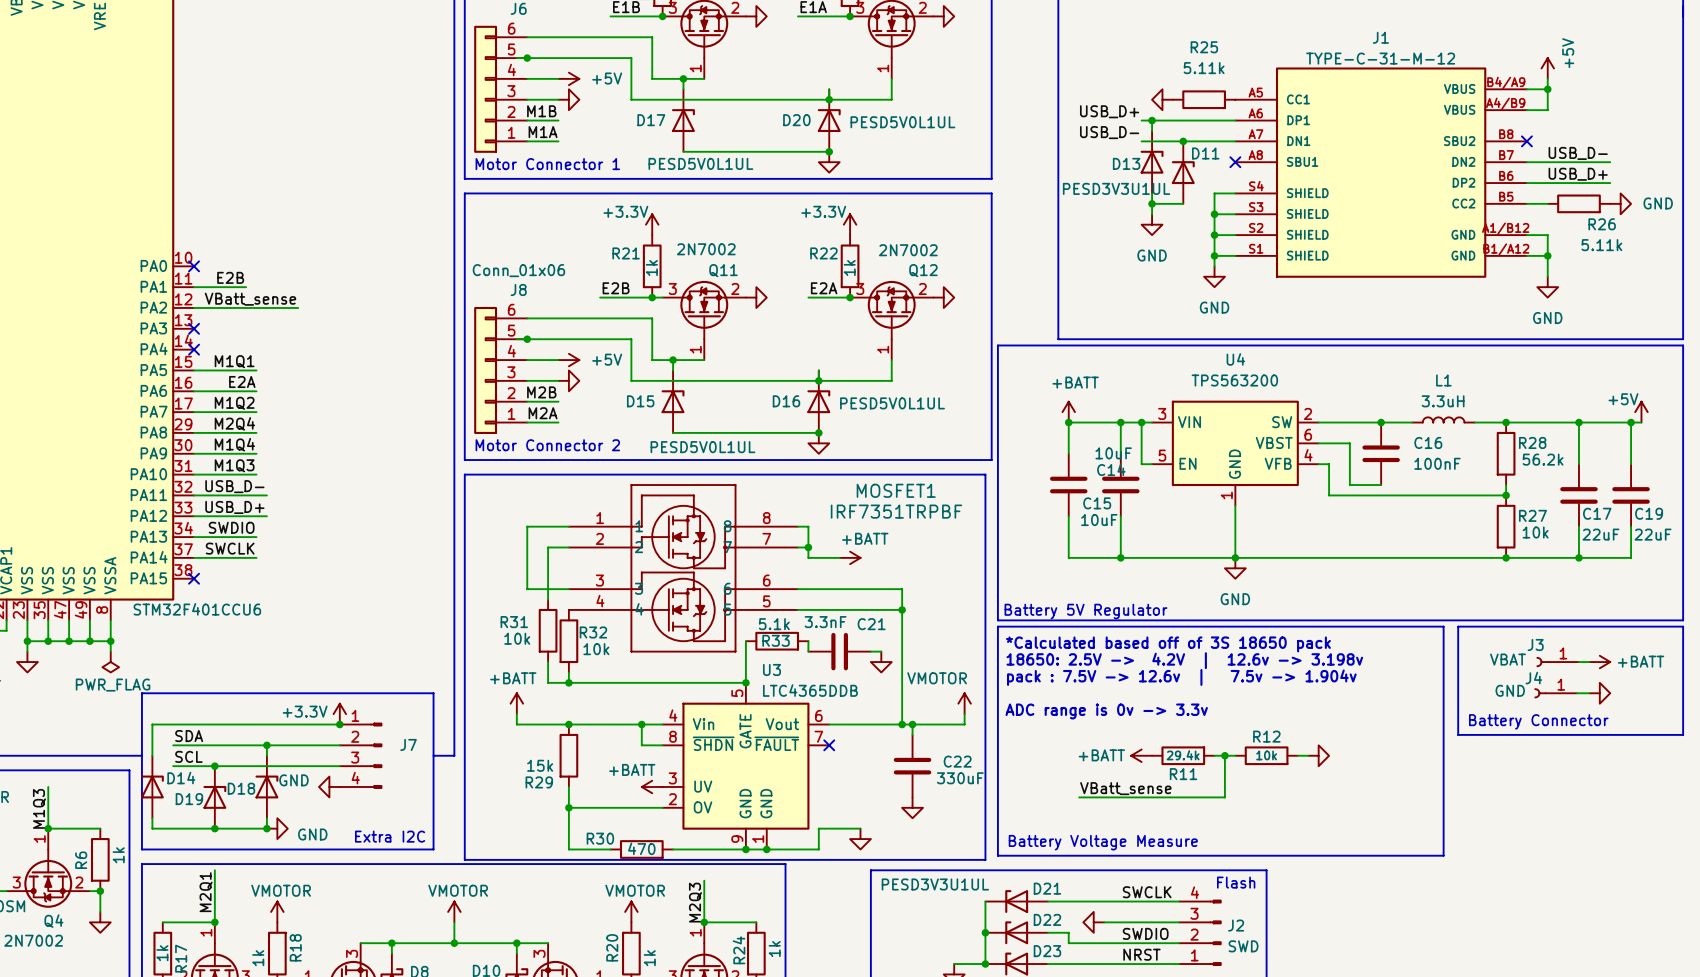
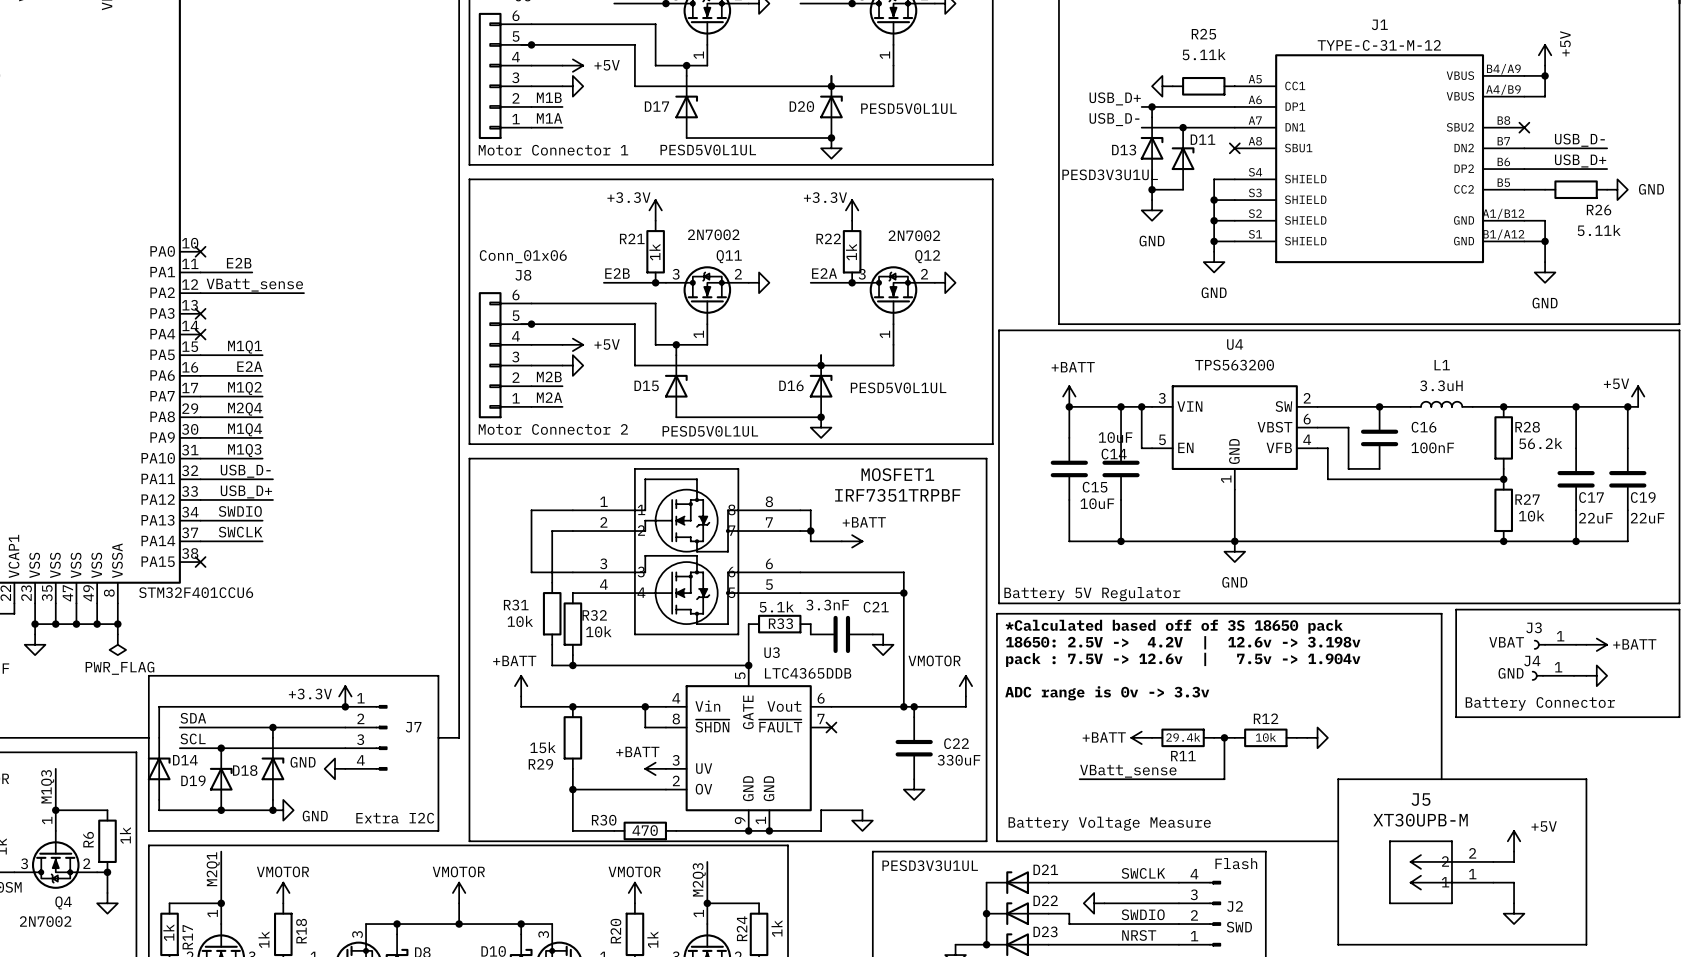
line: (997, 626) (1443, 626) (1443, 855) (997, 855) (997, 626) -> none
line: none -> (1338, 779) (1586, 779) (1586, 944) (1338, 944) (1338, 779)
wire: none -> (1441, 779) (1441, 613) (996, 613) (996, 841) (1338, 841)
power symbol: none -> +5V (1514, 841)
wire: none -> (1514, 851) (1514, 861) (1493, 861)
J5: none -> XT30UPB-M (1441, 872)
wire: none -> (1493, 882) (1514, 882) (1514, 903)
power symbol: none -> (1514, 913)

